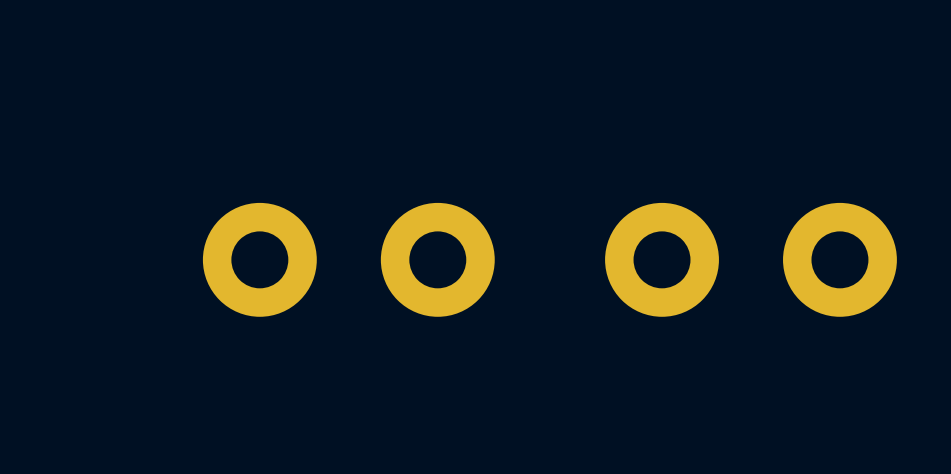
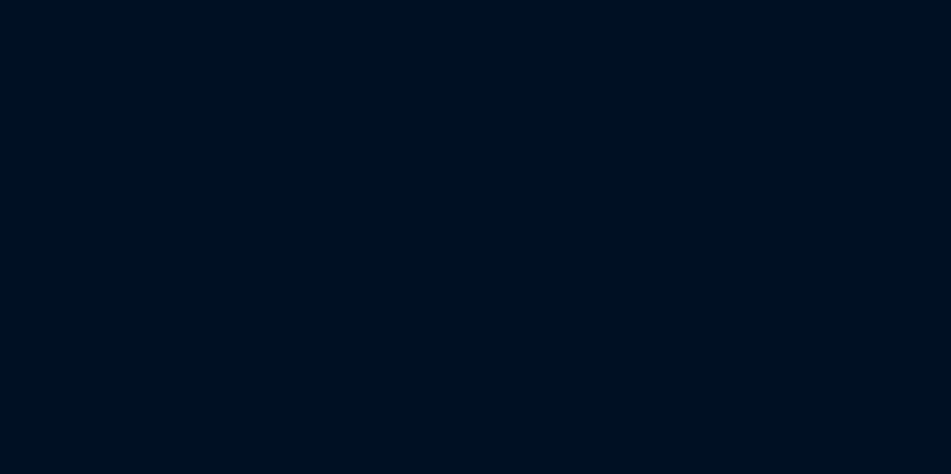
part: (348, 259) -> none
part: (750, 259) -> none

